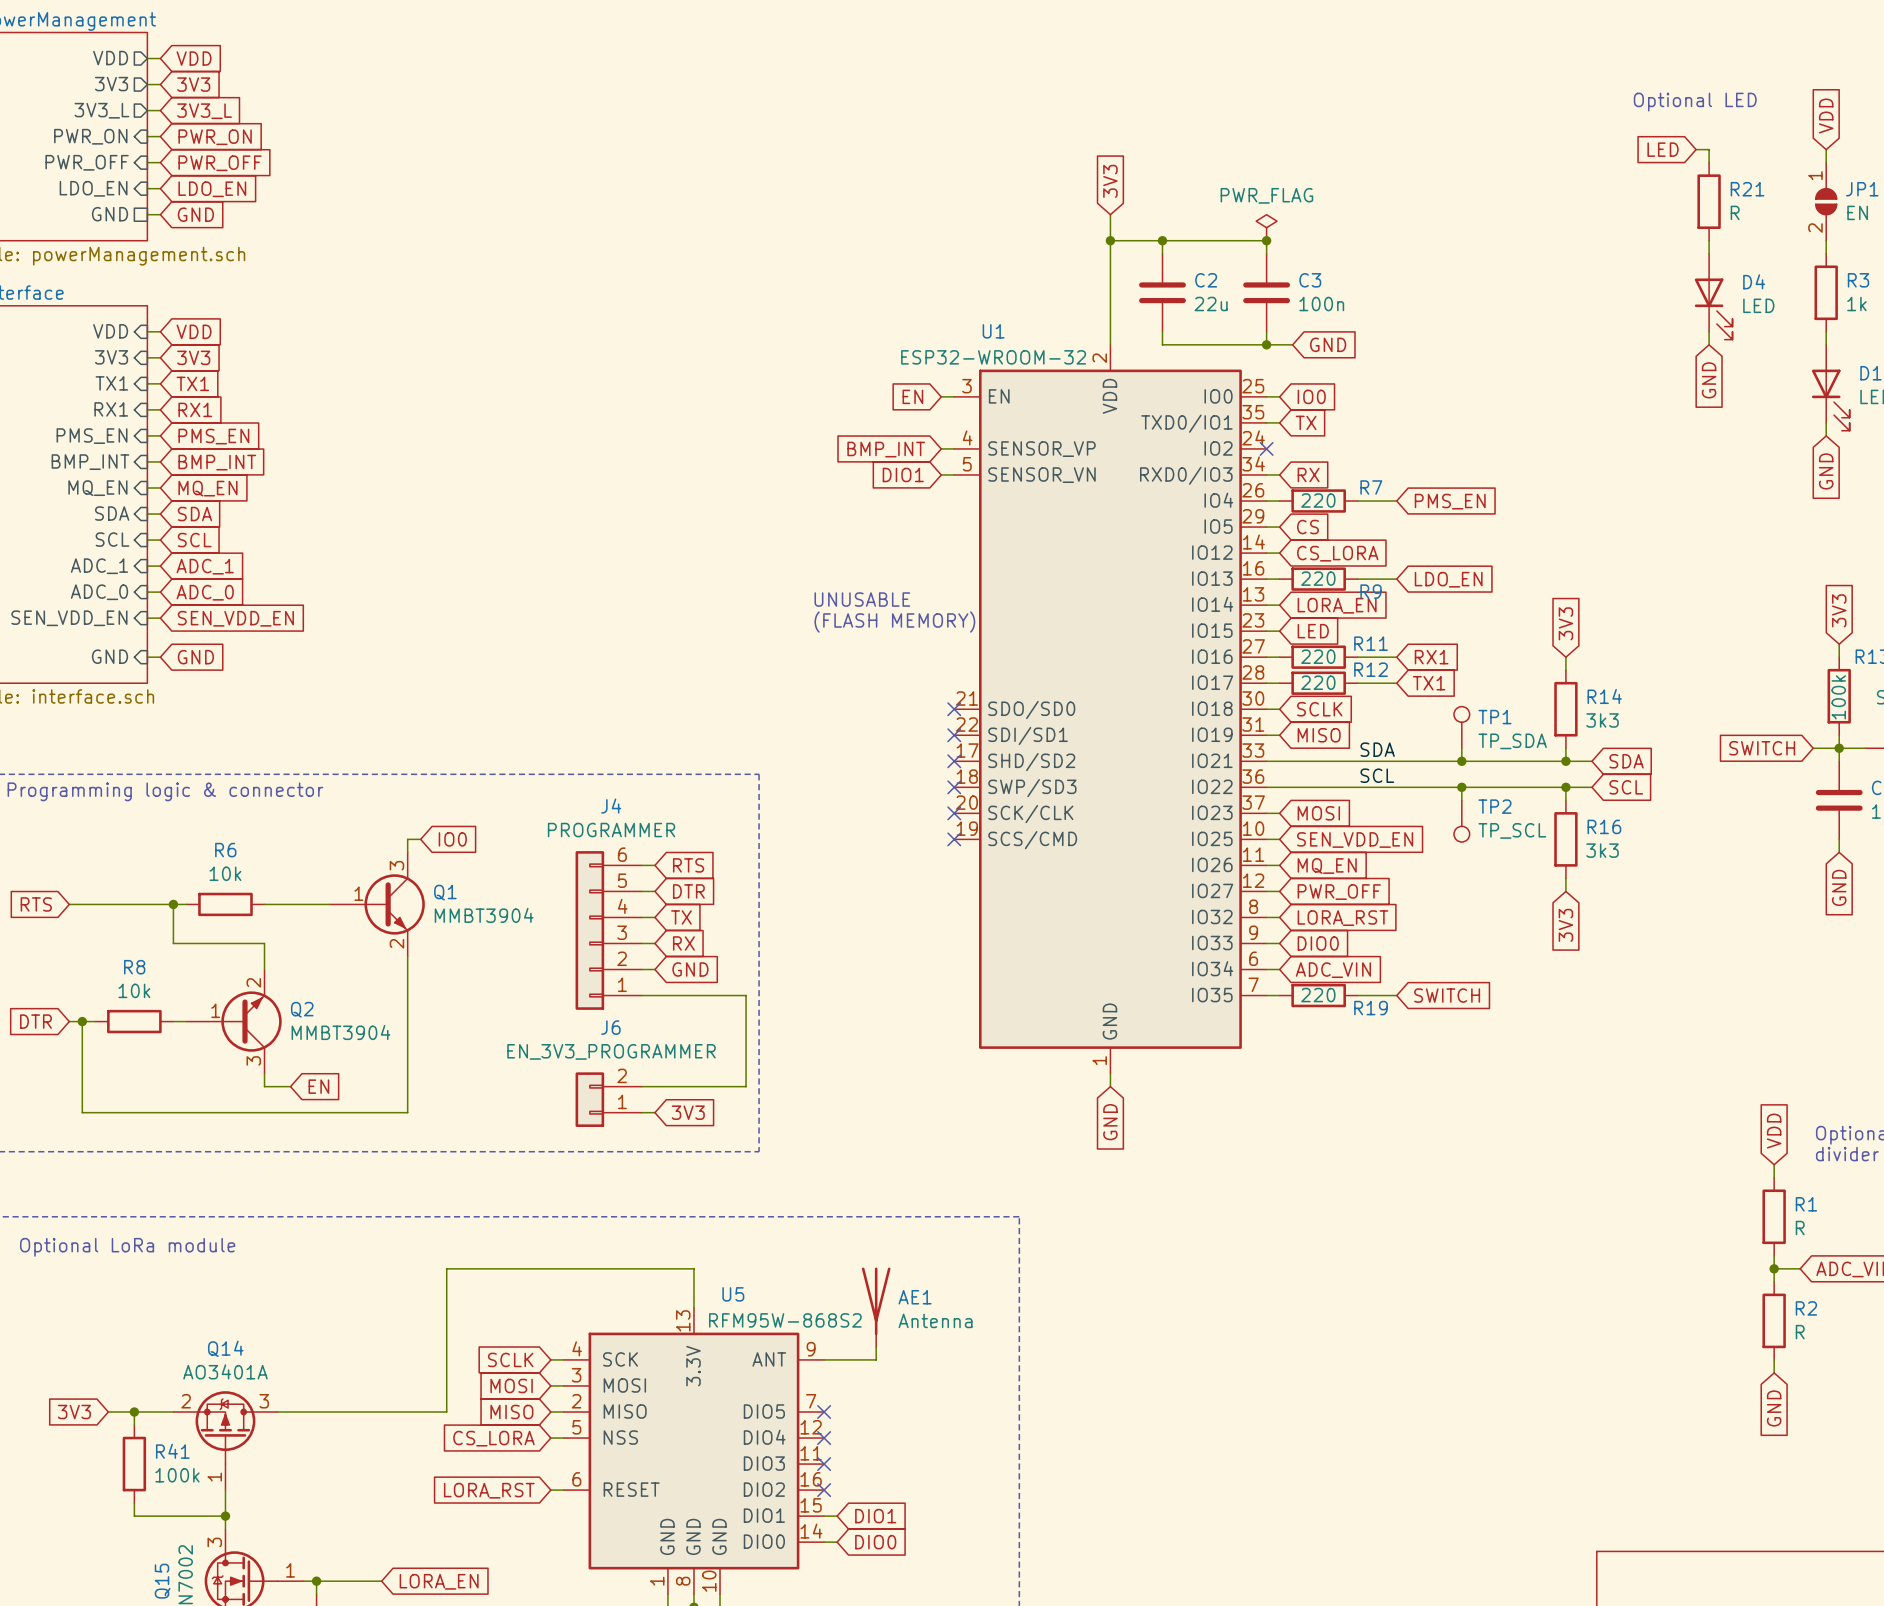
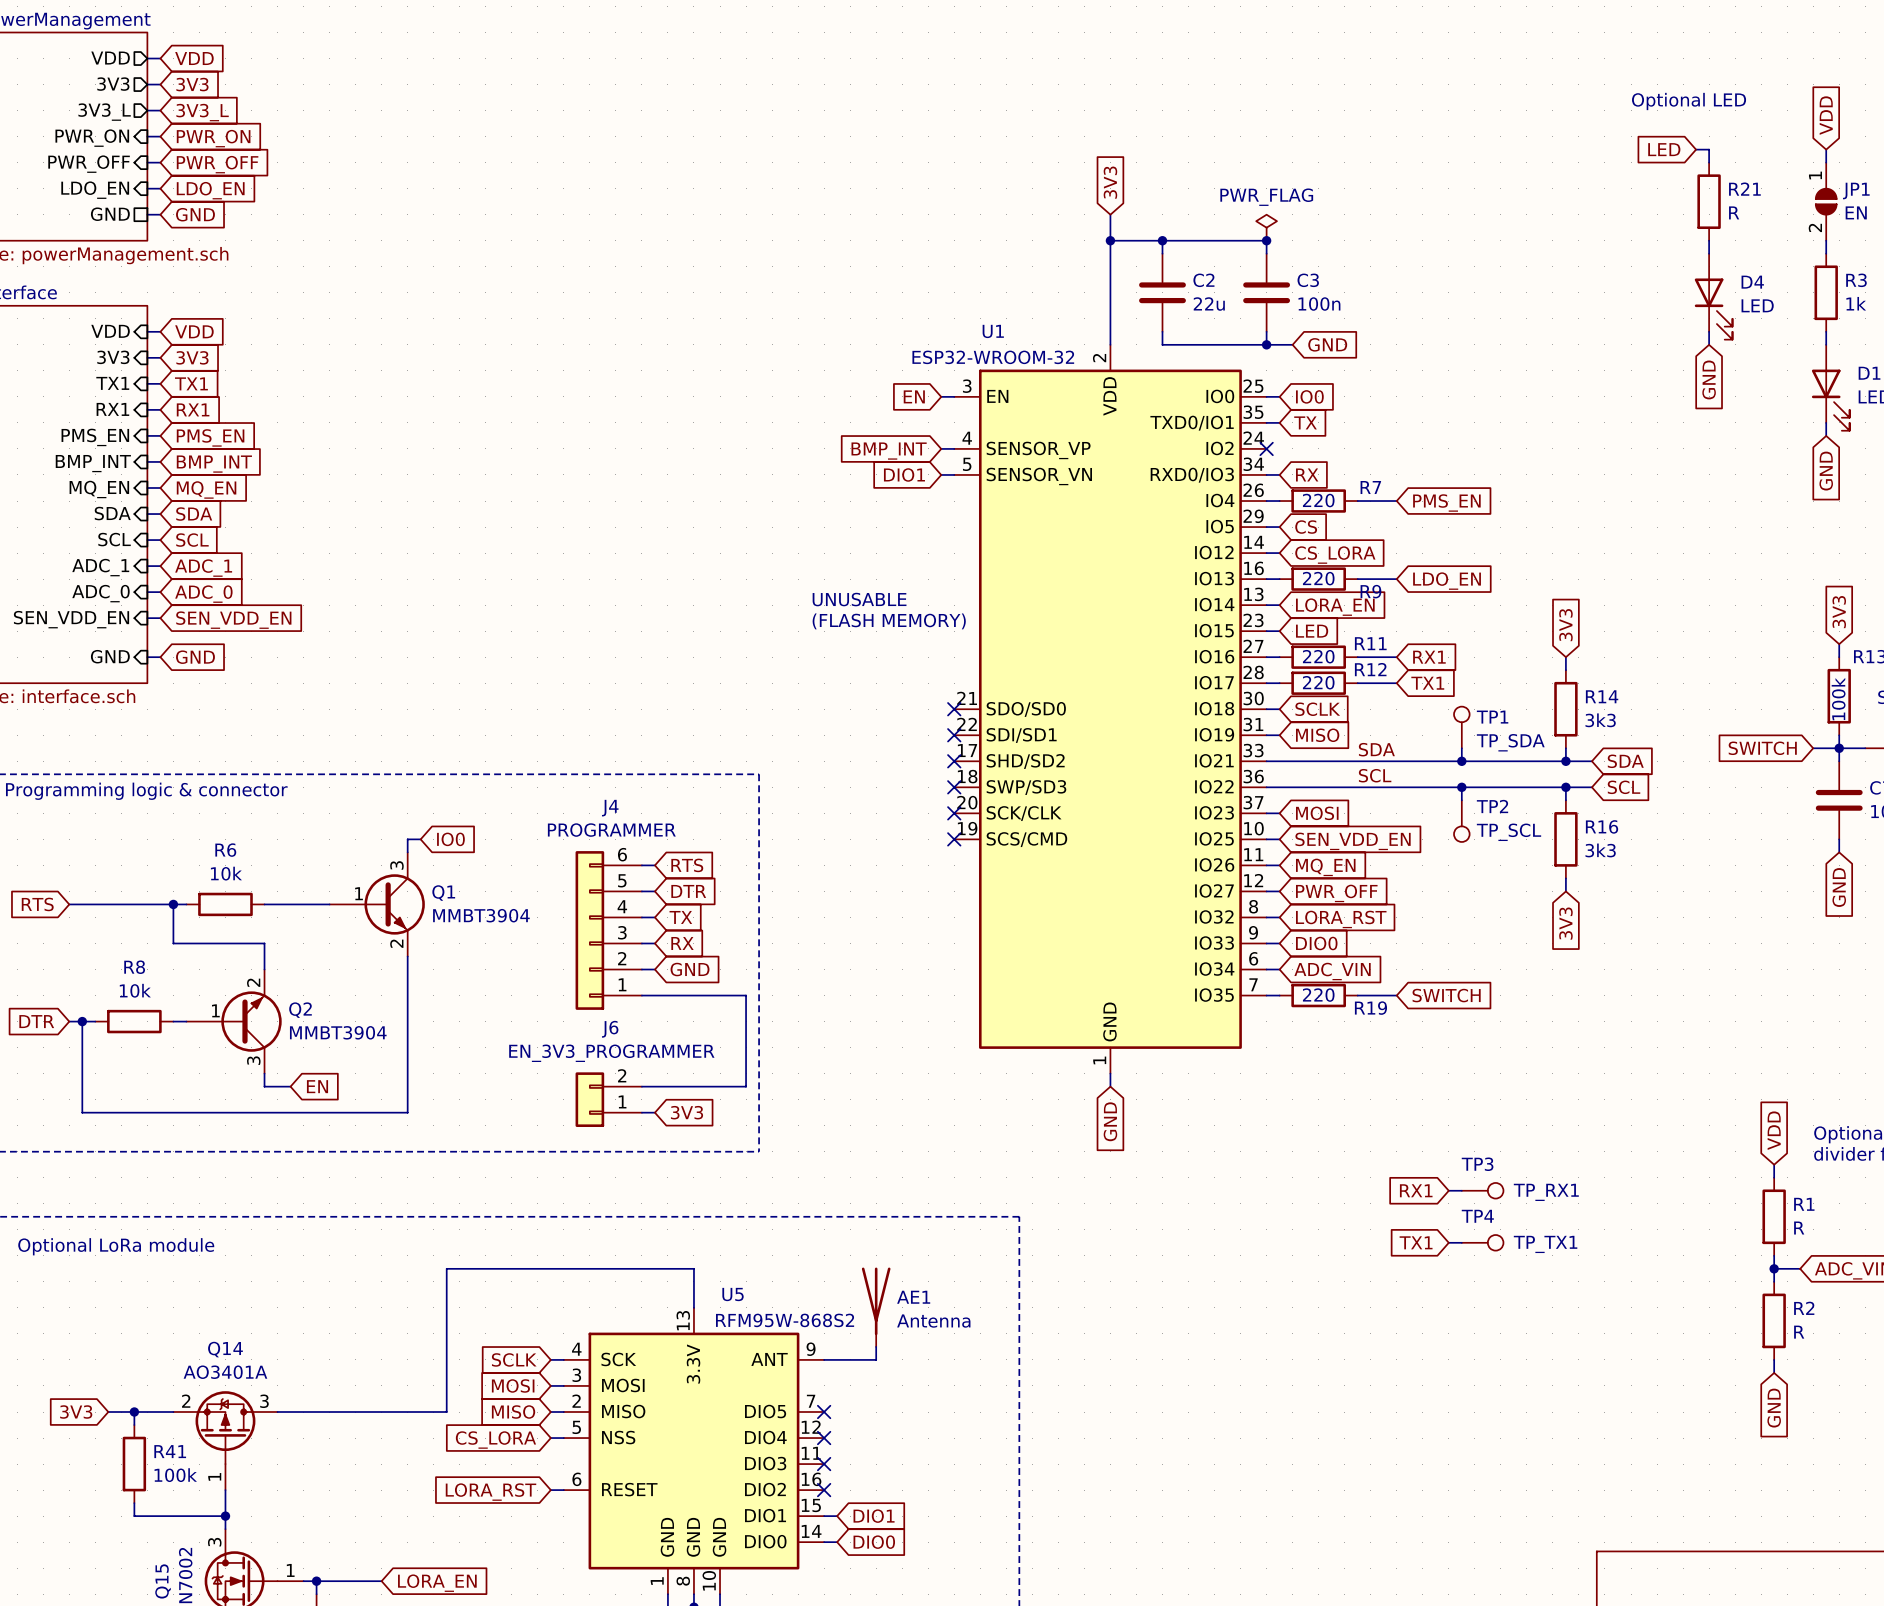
global label: none -> RX1 (1416, 1190)
wire: none -> (1448, 1190) (1461, 1190)
TP3: none -> TP_RX1 (1482, 1190)
global label: none -> TX1 (1416, 1242)
wire: none -> (1448, 1242) (1461, 1242)
TP4: none -> TP_TX1 (1482, 1242)

